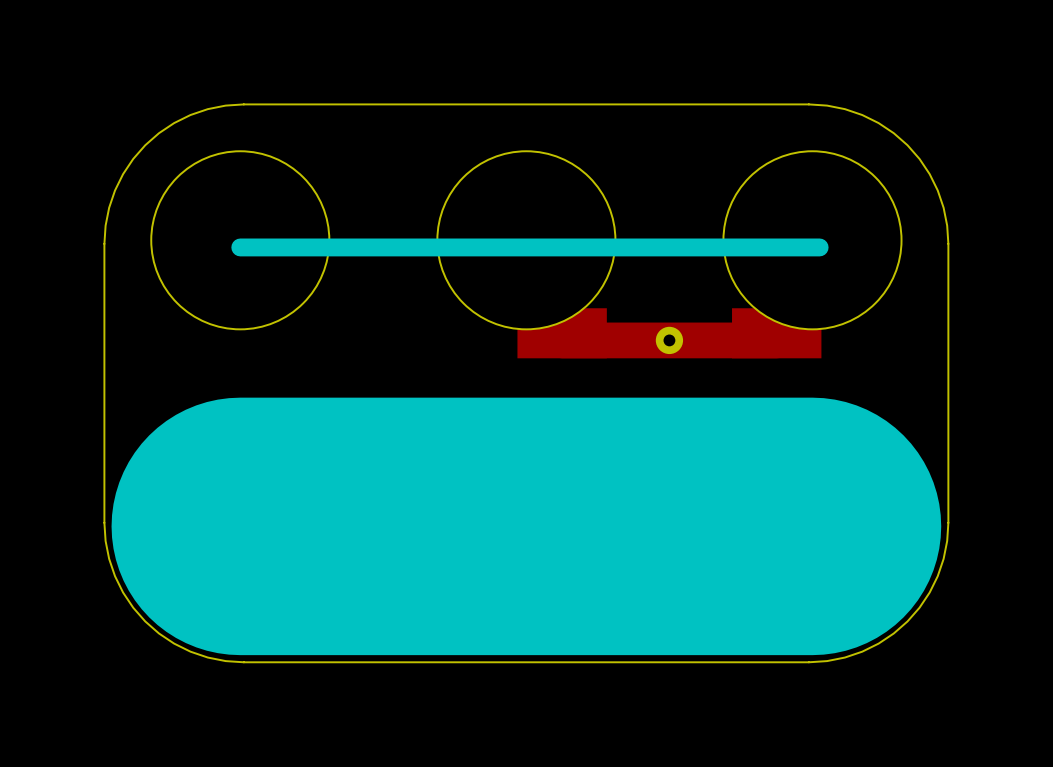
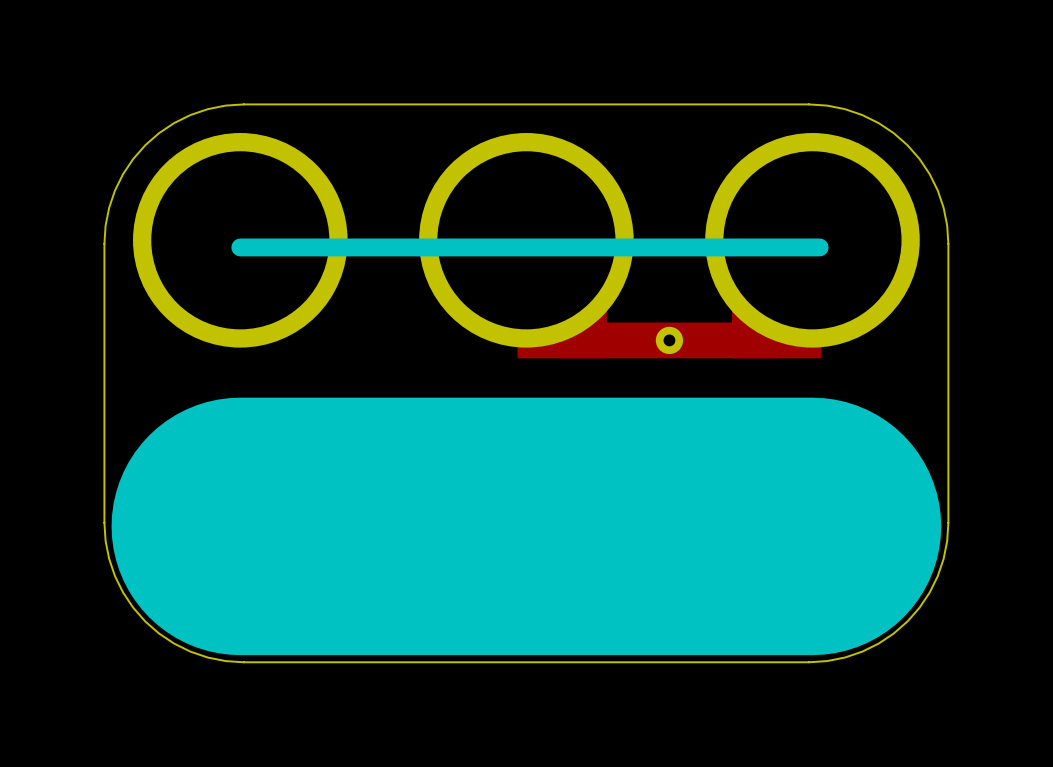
part footprint: [103, 103, 950, 664] -> [103, 103, 950, 664]

